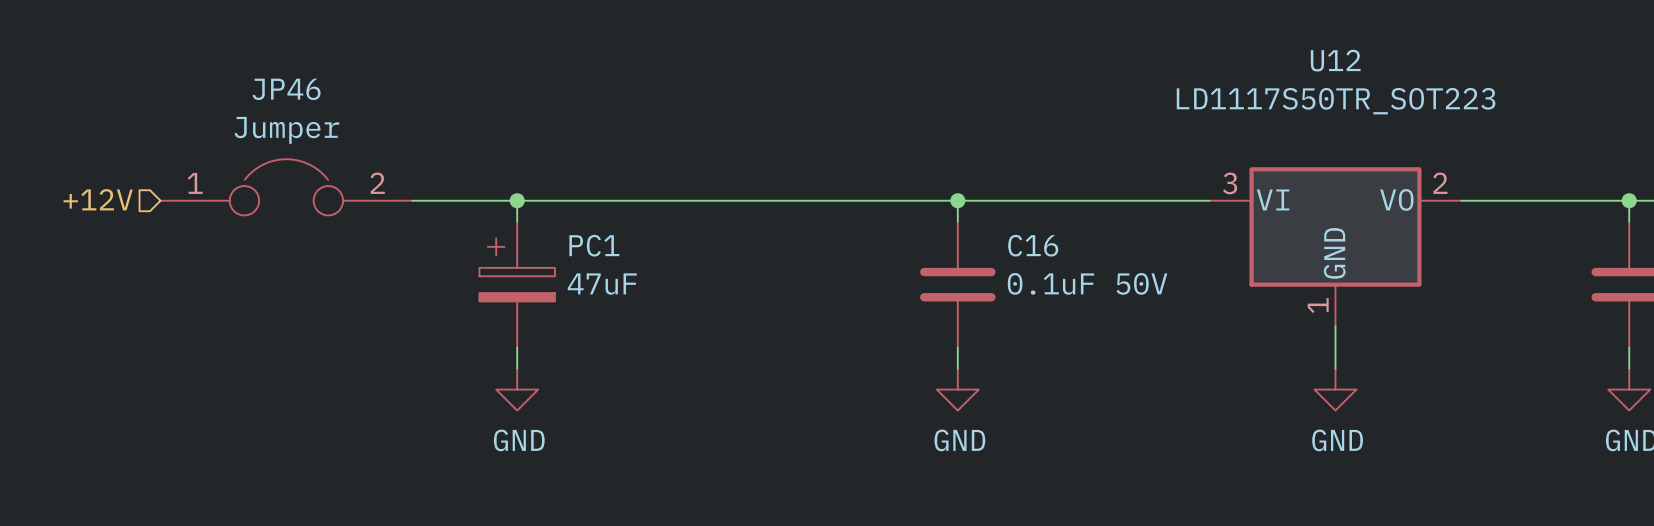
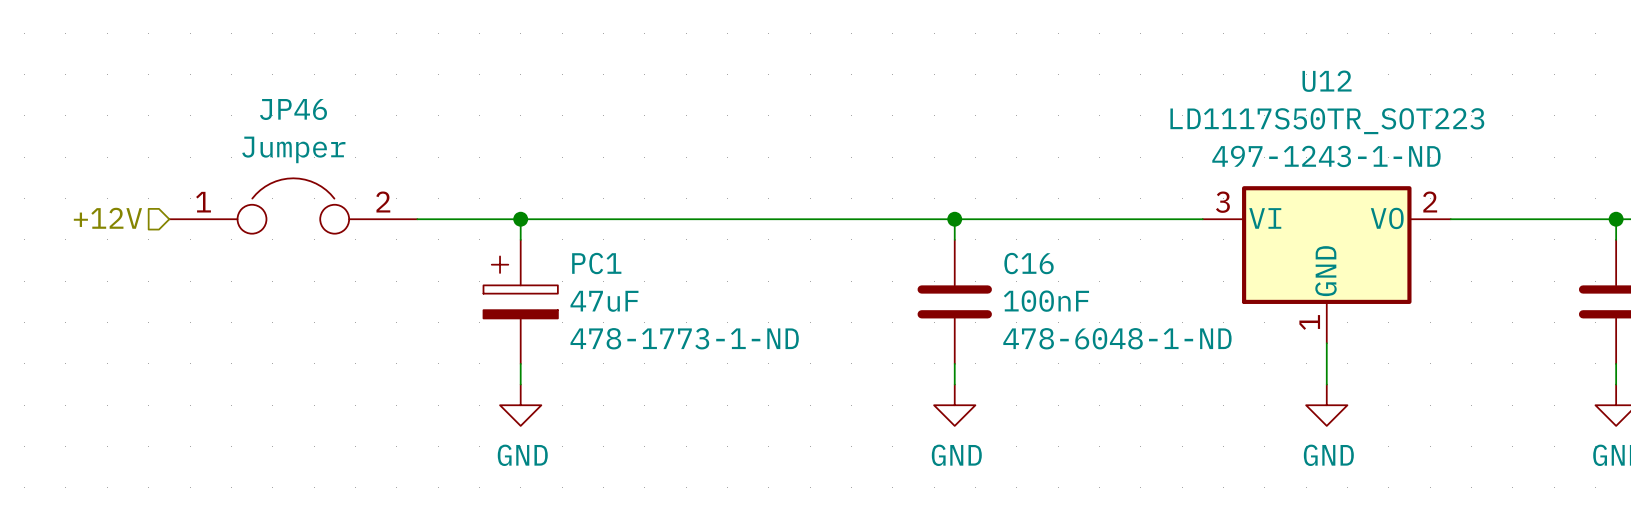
U12 text: none -> 497-1243-1-ND (1326, 156)
C16 value: 0.1uF 50V (1087, 283) -> 100nF (1046, 301)
PC1 text: none -> 478-1773-1-ND (684, 338)
C16 text: none -> 478-6048-1-ND (1117, 338)

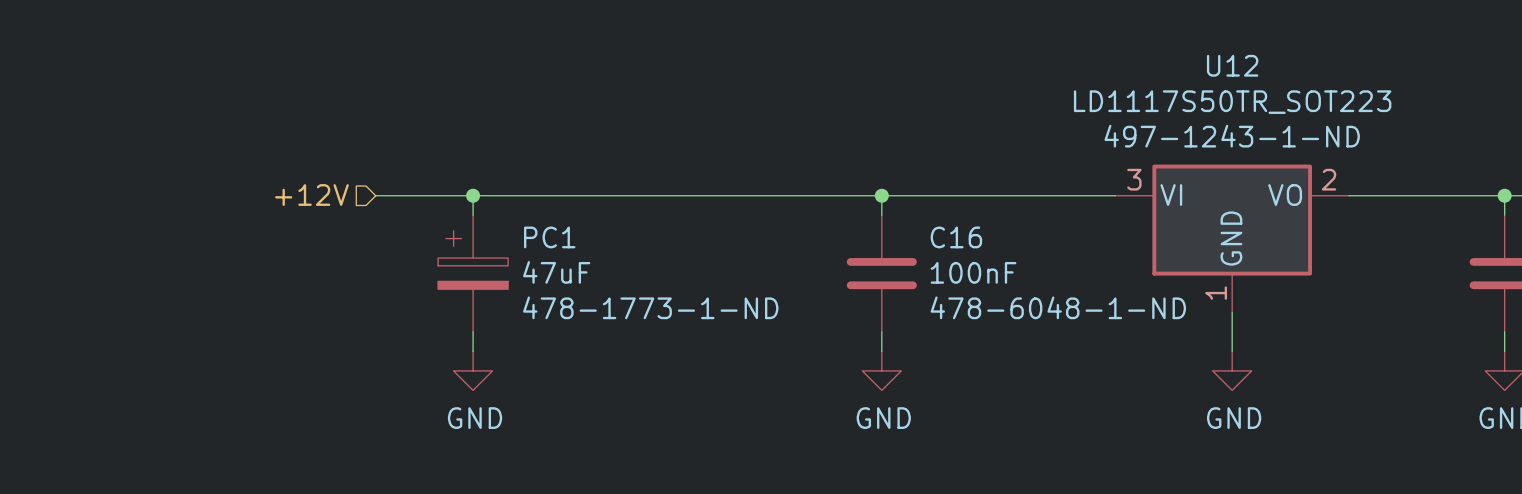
JP46: Jumper (293, 206) -> none
hierarchical label position: +12V (107, 218) -> +12V (311, 195)

